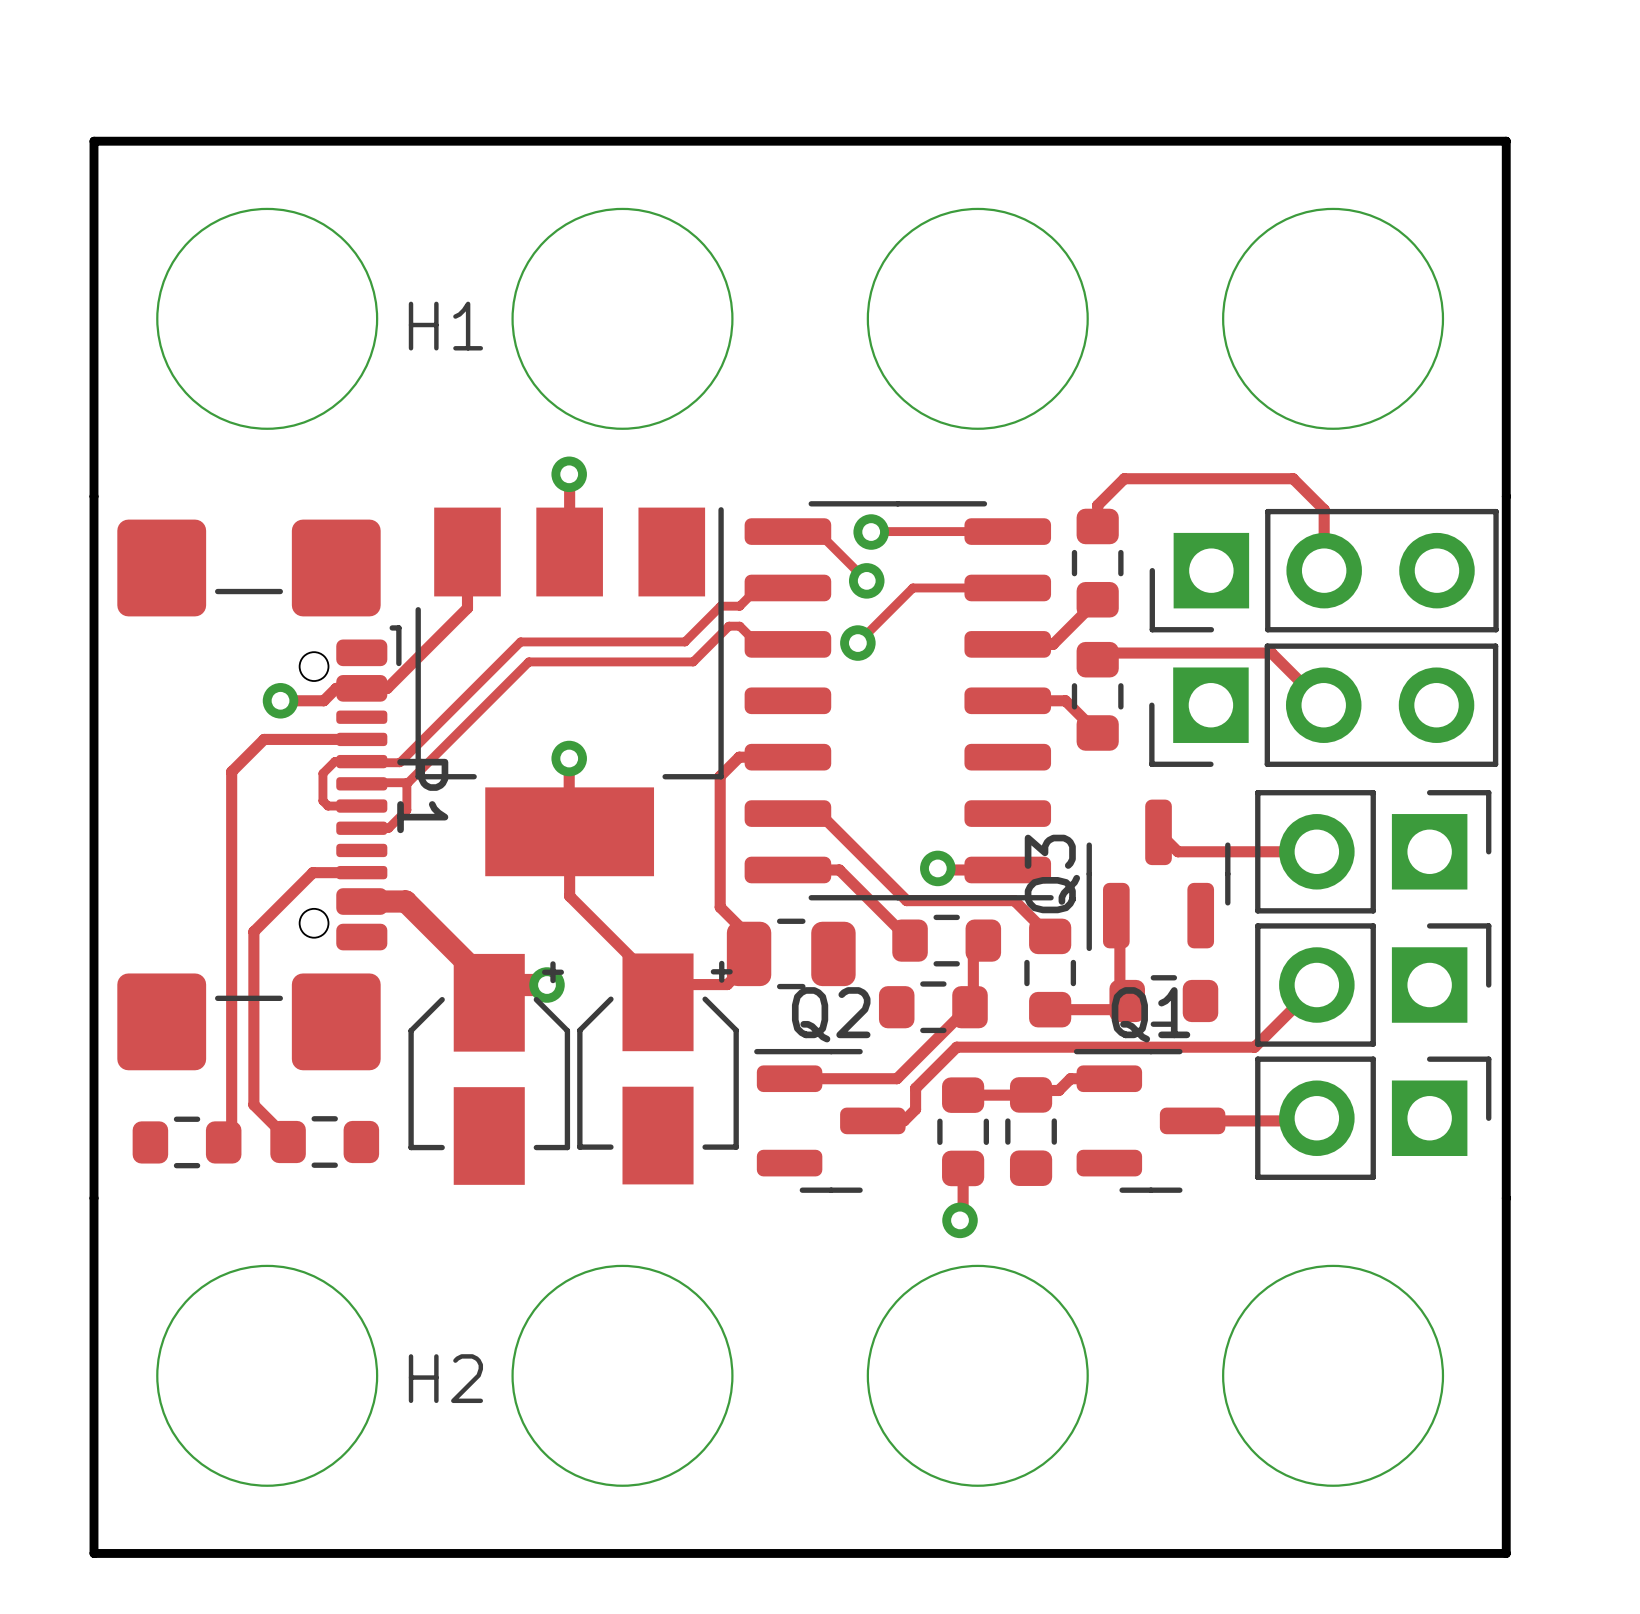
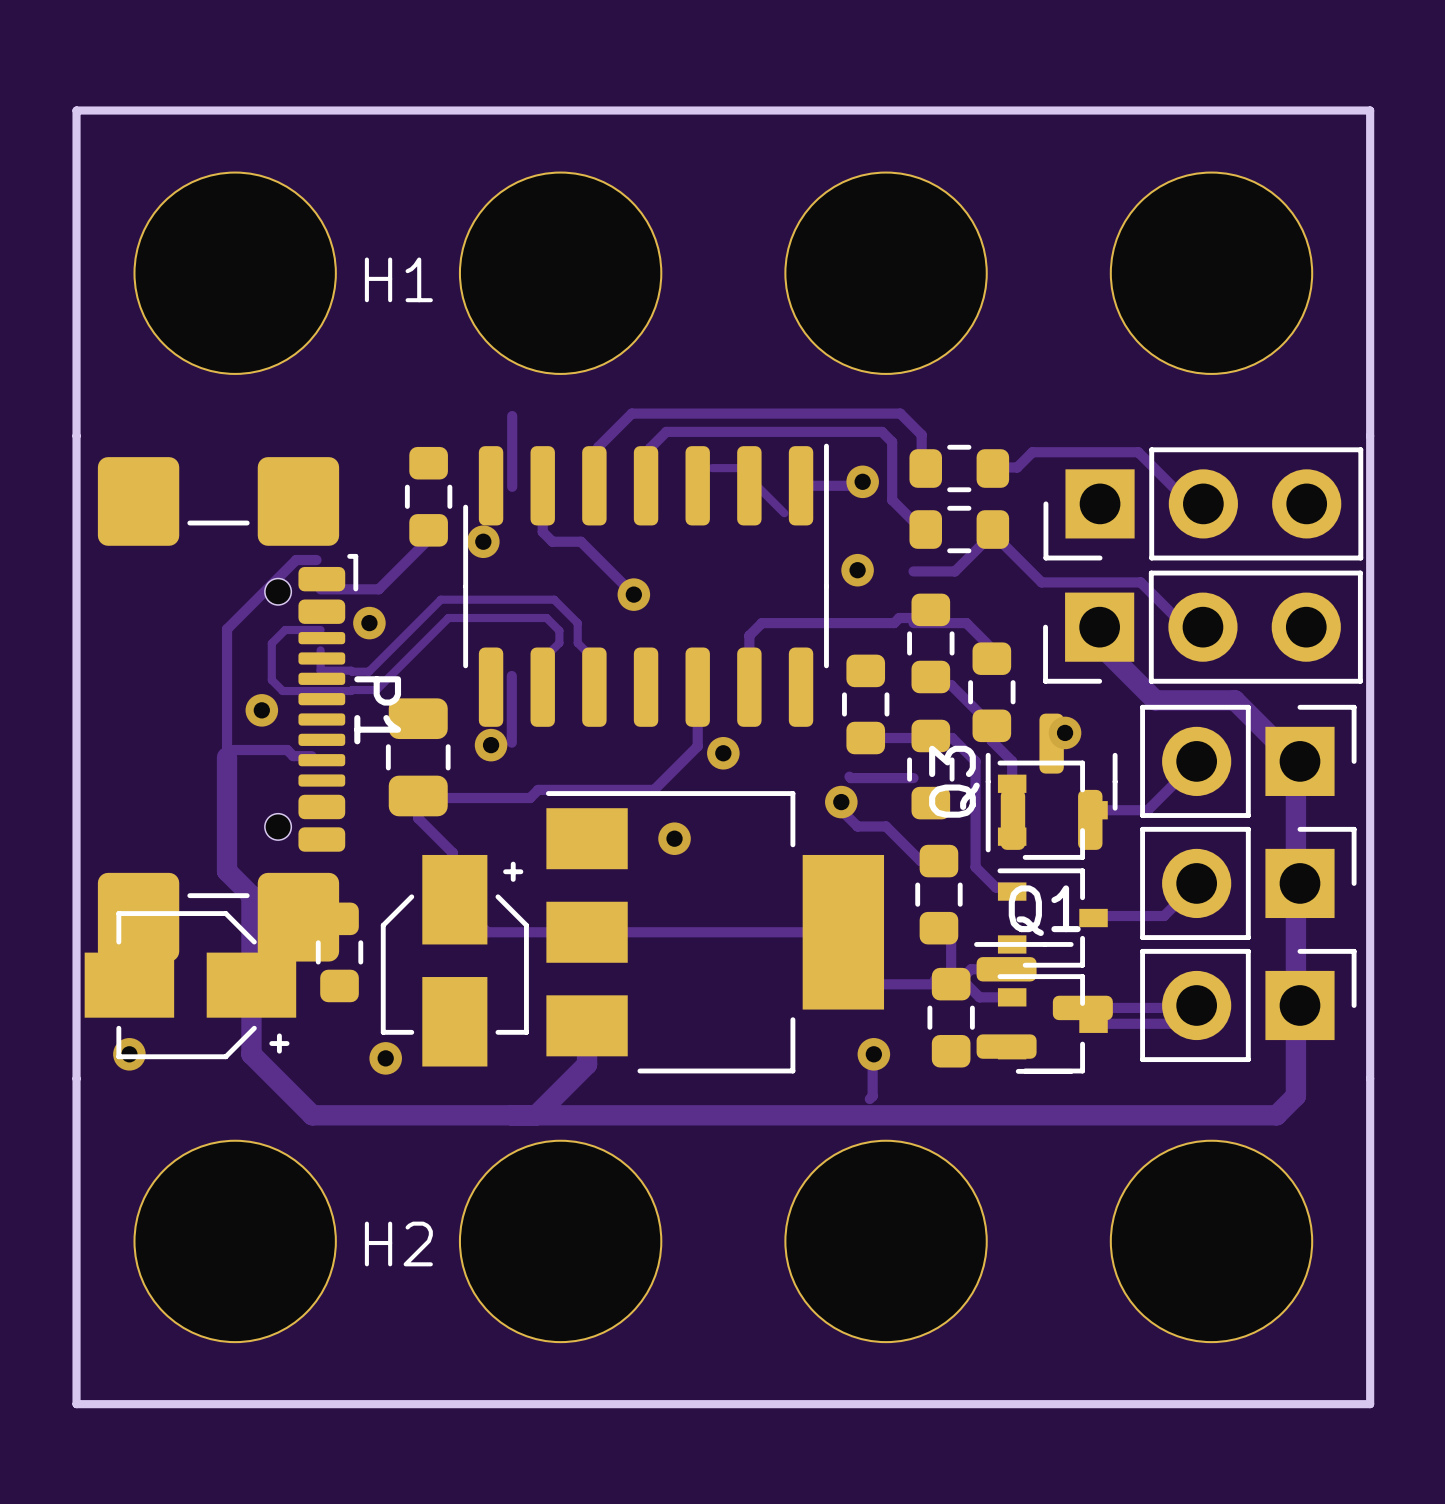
via: (569, 474) -> none
track: (1097, 526) (1097, 505) (1124, 478) (1293, 478) (1324, 509) (1324, 570) -> none
track: none -> (987, 467) (1017, 467) (1032, 452) (1138, 452) (1195, 509)
track: (871, 531) (1007, 531) -> none
via: (871, 532) -> none
track: none -> (921, 468) (921, 434) (900, 413) (631, 413) (598, 446) (598, 485)
part: none -> (959, 468)
track: none -> (862, 481) (858, 485) (801, 485)
via: none -> (862, 481)
track: none -> (542, 485) (542, 531) (552, 541) (580, 541) (633, 594)
track: none -> (650, 485) (650, 448) (666, 431) (881, 431) (892, 442) (892, 500) (921, 529)
track: (467, 552) (467, 608) (387, 688) (336, 688) (323, 700) (280, 700) -> none
part: none -> (428, 496)
part: (1097, 563) -> none
via: (866, 580) -> none
track: (787, 587) (757, 587) (739, 606) (720, 606) (684, 641) (520, 641) (399, 762) (334, 761) (322, 773) (322, 800) (328, 806) (361, 806) -> none
track: (1007, 587) (912, 587) (857, 643) -> none
part: none -> (959, 529)
track: none -> (988, 529) (1041, 582) (1140, 582) (1197, 639)
track: none -> (428, 539) (378, 589) (320, 589)
via: none -> (483, 541)
track: none -> (316, 560) (296, 560) (227, 629) (227, 757)
via: (857, 643) -> none
via: none -> (857, 570)
track: (787, 644) (757, 644) (739, 626) (728, 626) (693, 661) (528, 661) (408, 782) (361, 783) -> none
track: (1097, 659) (1104, 653) (1271, 653) (1323, 705) -> none
via: none -> (633, 594)
part rotation: 0° (569, 691) -> 90° counterclockwise (715, 932)
part position: (569, 691) -> (715, 932)
track: none -> (930, 618) (899, 618) (894, 623) (761, 623) (749, 635) (749, 687)
part: (1097, 696) -> none
via: (280, 700) -> none
via: none -> (369, 623)
part rotation: 0° (899, 700) -> 90° counterclockwise (646, 585)
track: none -> (320, 630) (285, 630) (271, 643) (271, 680) (282, 691) (376, 690) (448, 618) (546, 618) (559, 630) (559, 643) (542, 659)
track: none -> (1094, 639) (1155, 700) (1234, 700) (1295, 761) (1295, 1096) (1276, 1115) (312, 1115) (251, 1054) (251, 895) (227, 871) (227, 757)
part: none -> (930, 643)
track: none -> (320, 650) (320, 670) (368, 671) (440, 599) (554, 599) (577, 623) (577, 643) (594, 659)
track: (361, 739) (264, 739) (231, 771) (231, 1134) (223, 1142) -> none
track: (787, 757) (739, 757) (720, 776) (720, 907) (762, 949) (727, 984) (658, 984) (569, 896) (569, 831) -> none
via: (569, 758) -> none
track: none -> (930, 685) (951, 685) (991, 725) (991, 741) (1012, 761) (1012, 779)
track: none -> (697, 687) (697, 746) (654, 789) (538, 789) (530, 798) (420, 798)
part: none -> (991, 692)
track: (406, 782) (406, 810) (388, 828) (361, 828) -> none
part: none -> (865, 704)
via: none -> (261, 710)
track: (787, 813) (819, 813) (906, 900) (1014, 900) (1050, 936) -> none
via: none -> (1065, 732)
track: none -> (865, 738) (952, 738) (975, 761) (975, 867) (995, 887) (1012, 887)
track: (1158, 832) (1177, 851) (1316, 851) -> (1097, 810) (1147, 810) (1196, 761)
via: none -> (491, 745)
via: none -> (723, 753)
track: none -> (311, 756) (293, 756) (287, 750) (234, 750) (227, 757)
part: none -> (930, 769)
via position: (937, 868) -> (841, 802)
track: (787, 869) (839, 869) (910, 940) -> none
track: (361, 872) (312, 872) (253, 931) (253, 1104) (288, 1139) (288, 1142) -> none
track: none -> (418, 795) (418, 818) (452, 852) (452, 897) (487, 932) (843, 932)
track: none -> (841, 802) (841, 810) (857, 826) (886, 826) (920, 861) (951, 861)
track: (361, 901) (405, 901) (489, 985) (546, 985) -> none
part: none -> (1052, 810)
track: (1116, 915) (1119, 919) (1119, 1003) (1114, 1009) (1050, 1009) -> none
via: none -> (674, 838)
part: (946, 940) -> none
track: (983, 940) (973, 950) (973, 1002) (896, 1078) (789, 1078) -> none
part rotation: 0° (791, 953) -> 90° clockwise (418, 757)
part position: (791, 953) -> (418, 757)
part position: (1050, 973) -> (938, 894)
part footprint: [1109, 975, 1219, 1027] -> [997, 868, 1108, 968]
via: (546, 985) -> none
part: (933, 1007) -> none
track: (1281, 1020) (1254, 1047) (956, 1047) (915, 1088) (915, 1109) (904, 1120) (872, 1120) -> (1164, 915) (1095, 915)
track: none -> (951, 928) (951, 984) (966, 984) (979, 997) (1012, 997)
part rotation: 0° (658, 1068) -> 90° clockwise (190, 985)
part position: (658, 1068) -> (190, 985)
part position: (489, 1069) -> (454, 960)
Q2: (829, 1120) -> none
part: (963, 1131) -> none
part position: (1031, 1131) -> (951, 1017)
part: none -> (1052, 1023)
track: none -> (1093, 1023) (1178, 1023)
track: none -> (587, 1025) (587, 1064) (536, 1115)
part: (187, 1142) -> none
part rotation: 0° (324, 1142) -> 90° clockwise (339, 952)
part position: (324, 1142) -> (339, 952)
via: none -> (129, 1054)
via: none -> (385, 1058)
via position: (960, 1220) -> (873, 1054)

